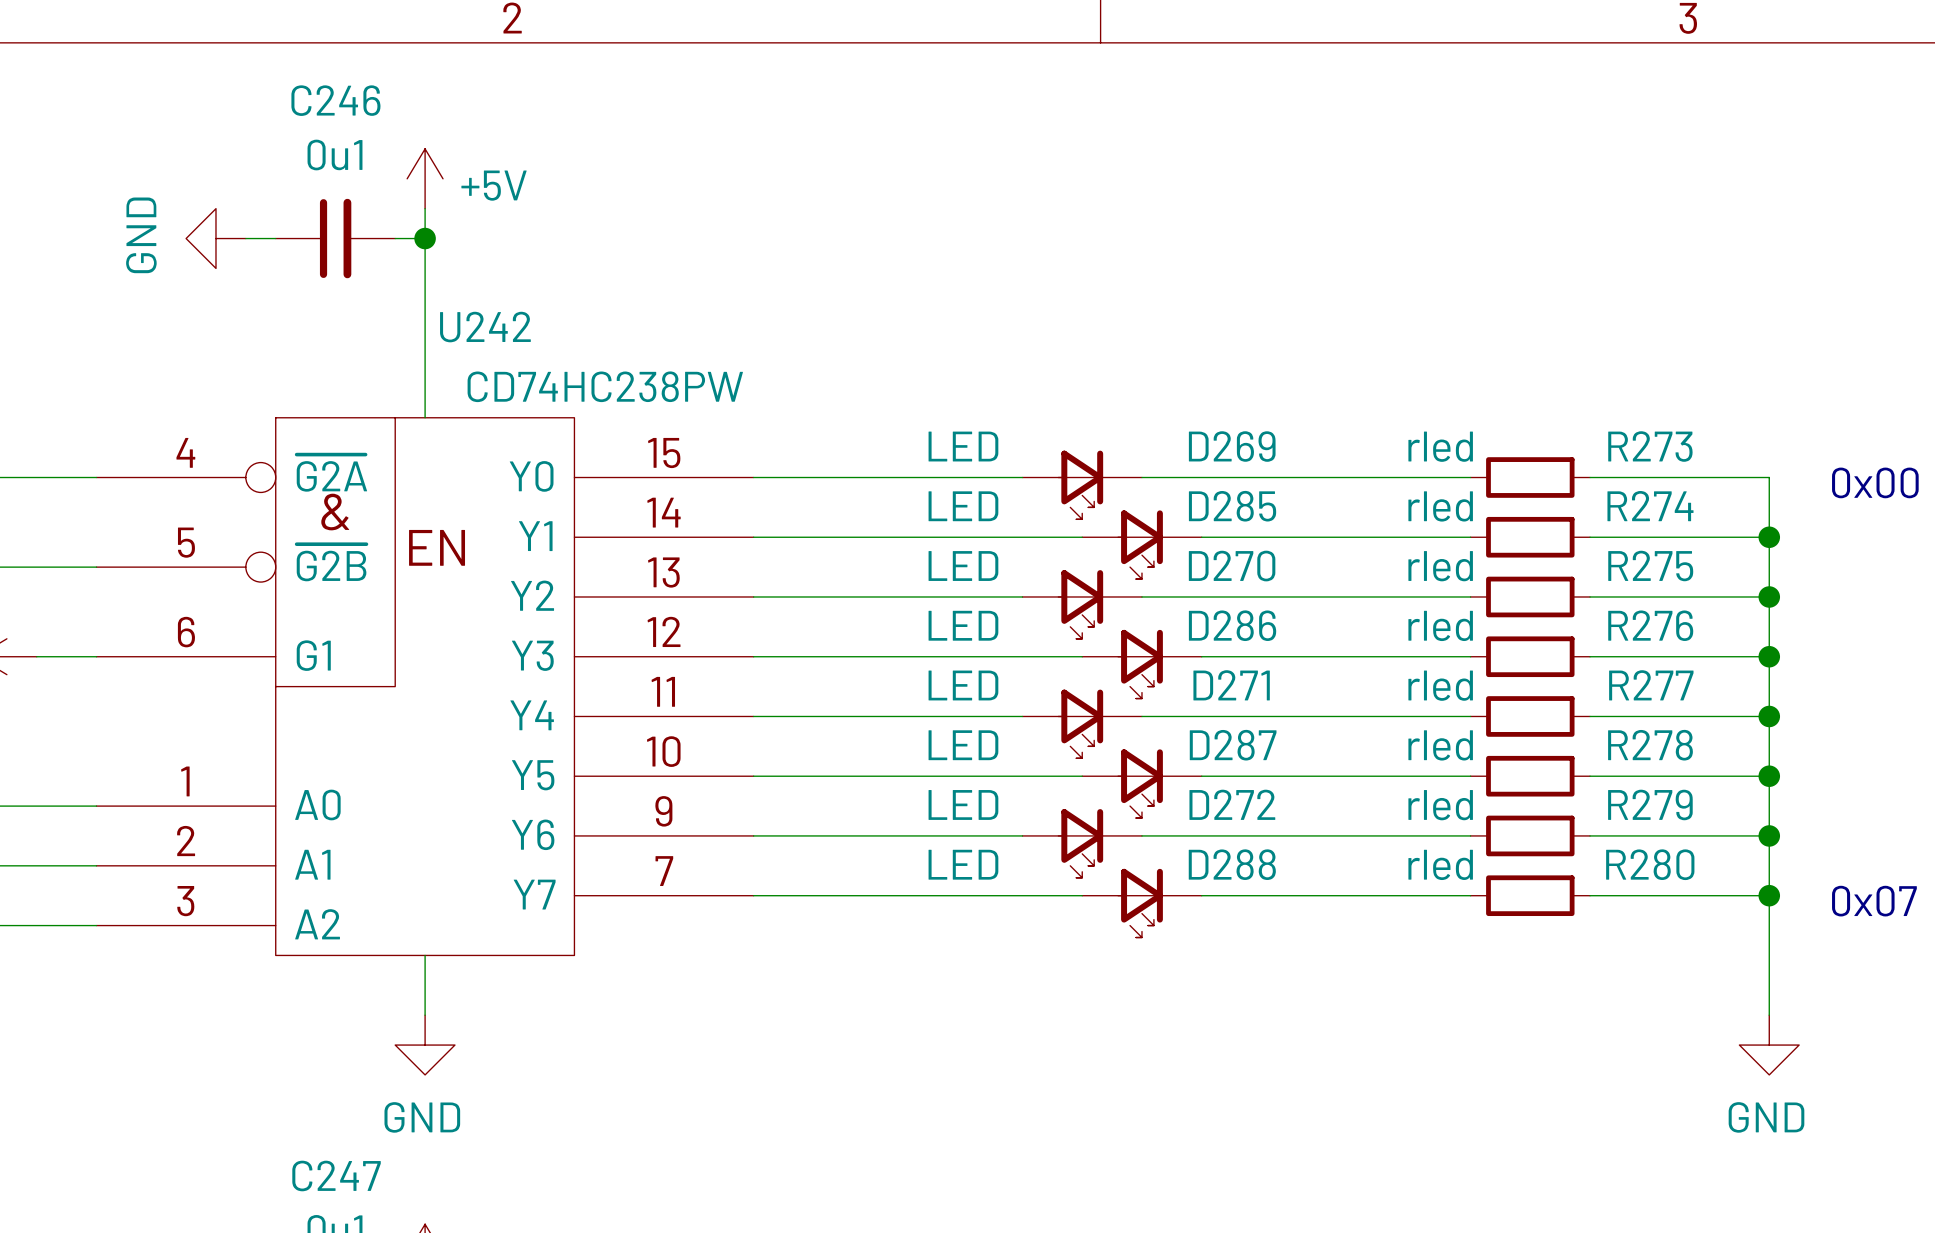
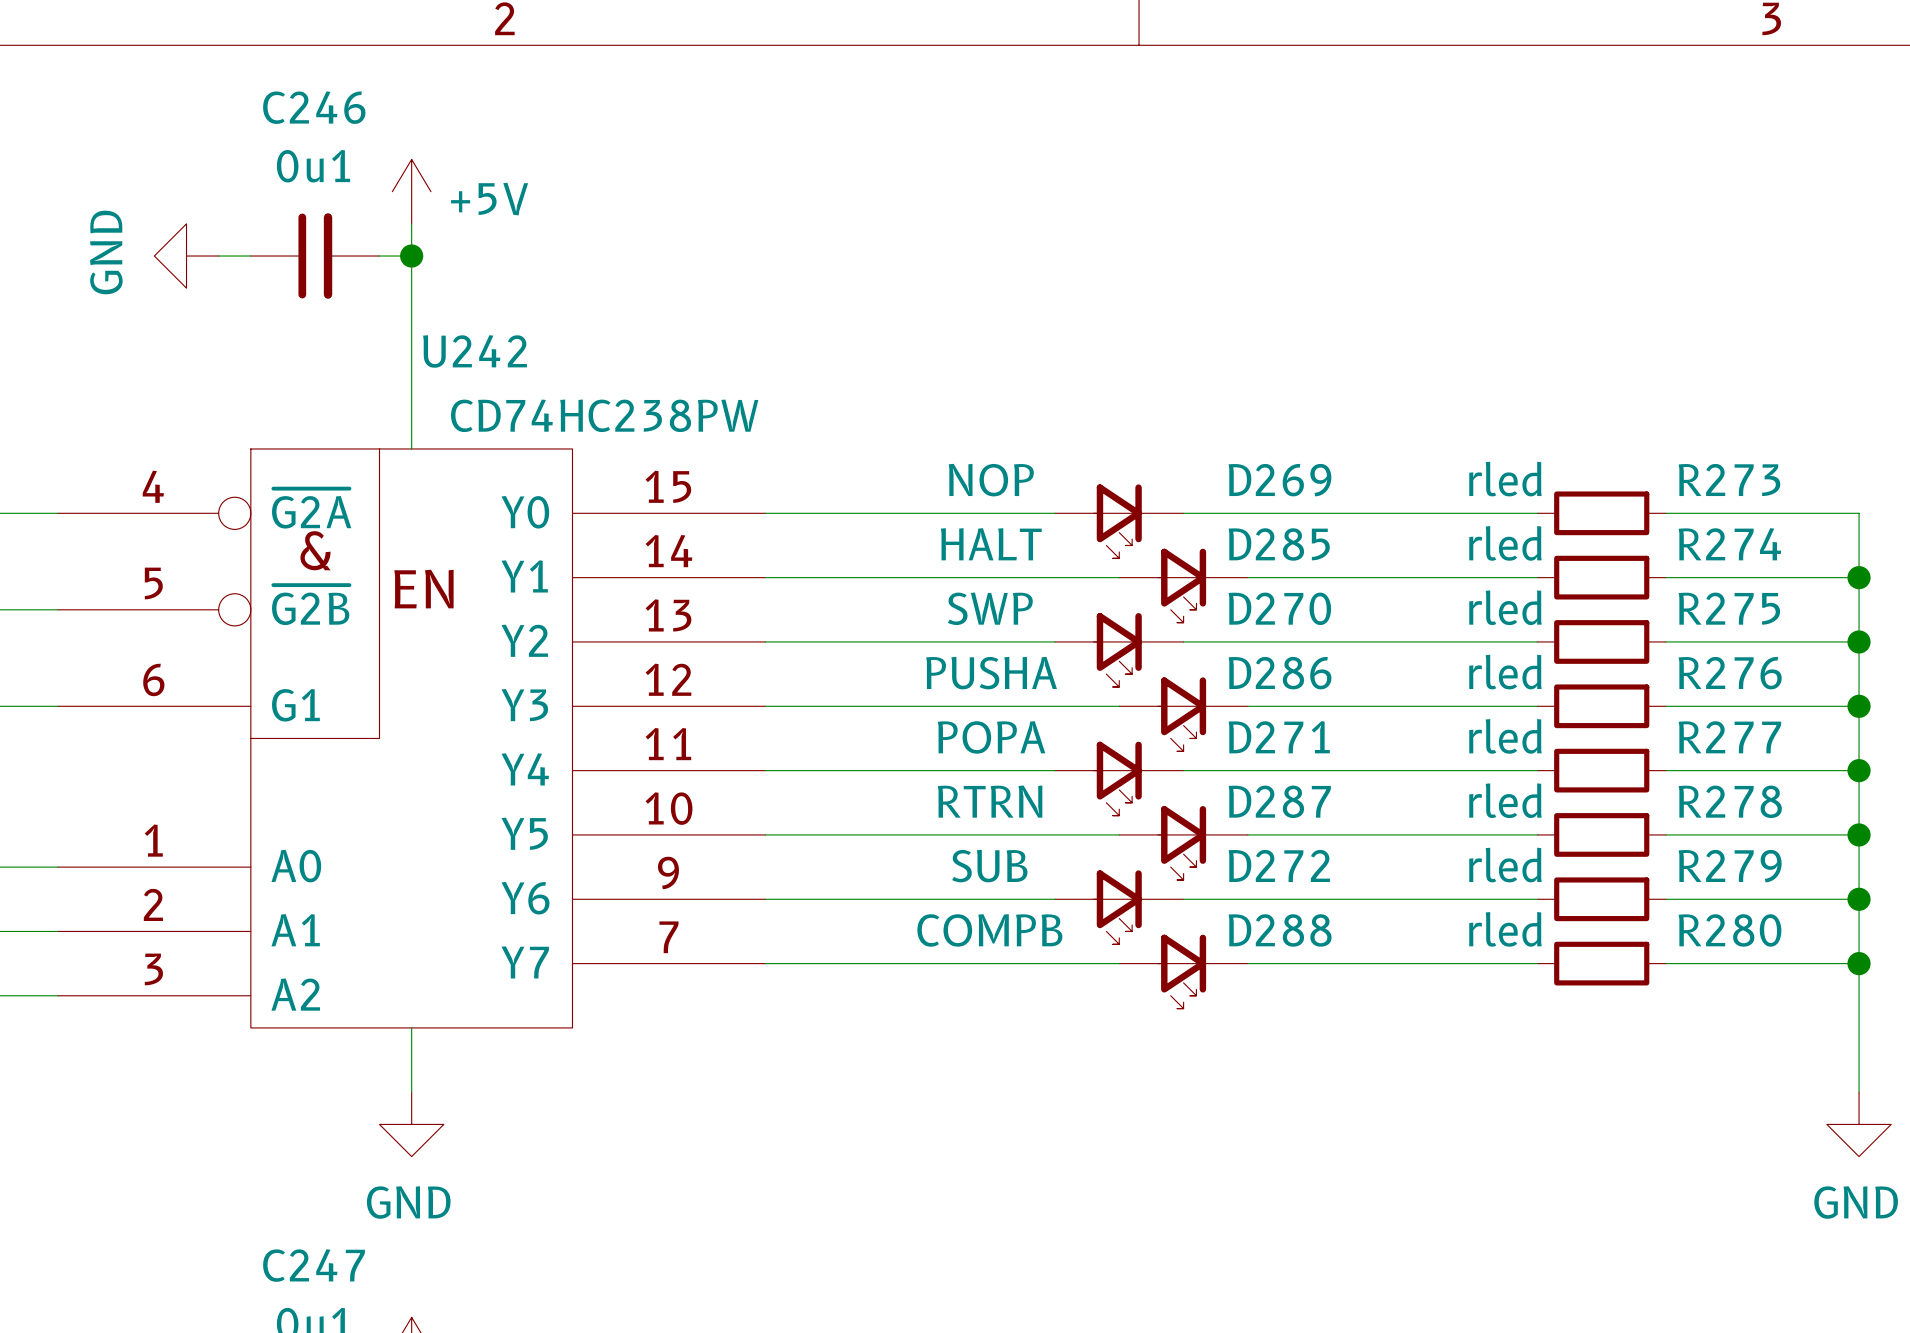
D269 value: LED (963, 446) -> NOP (991, 480)
D285 value: LED (963, 506) -> HALT (991, 544)
D270 value: LED (963, 566) -> SWP (990, 608)
D286 value: LED (963, 625) -> PUSHA (991, 673)
D271 value: LED (963, 685) -> POPA (991, 737)
D287 value: LED (963, 745) -> RTRN (990, 801)
D272 value: LED (963, 804) -> SUB (989, 866)
D288 value: LED (963, 864) -> COMPB (989, 930)

